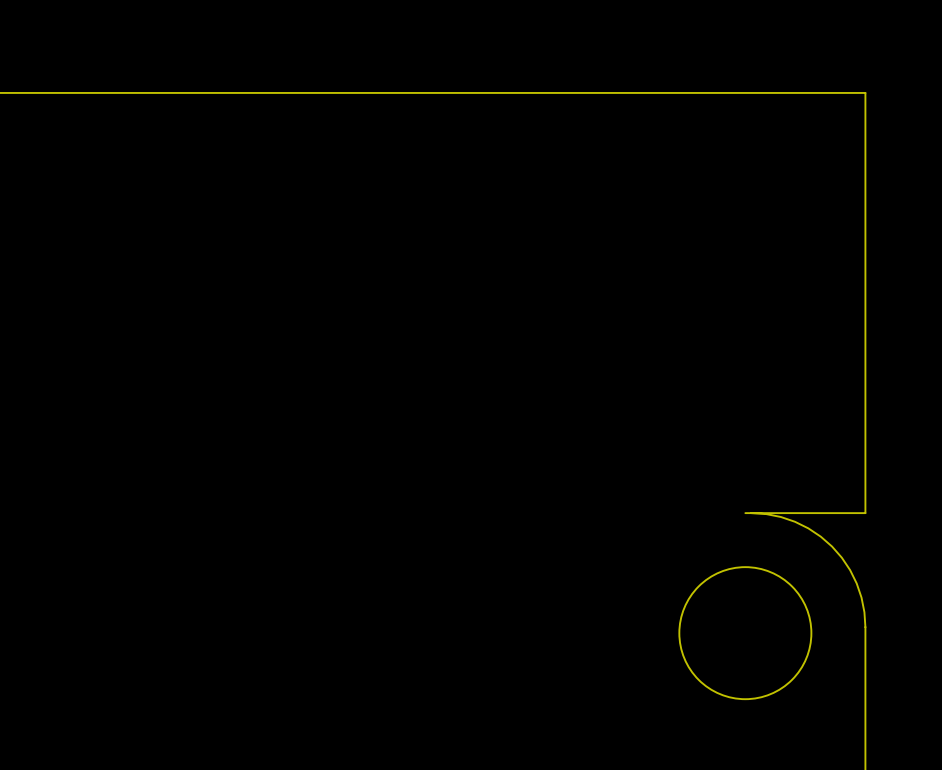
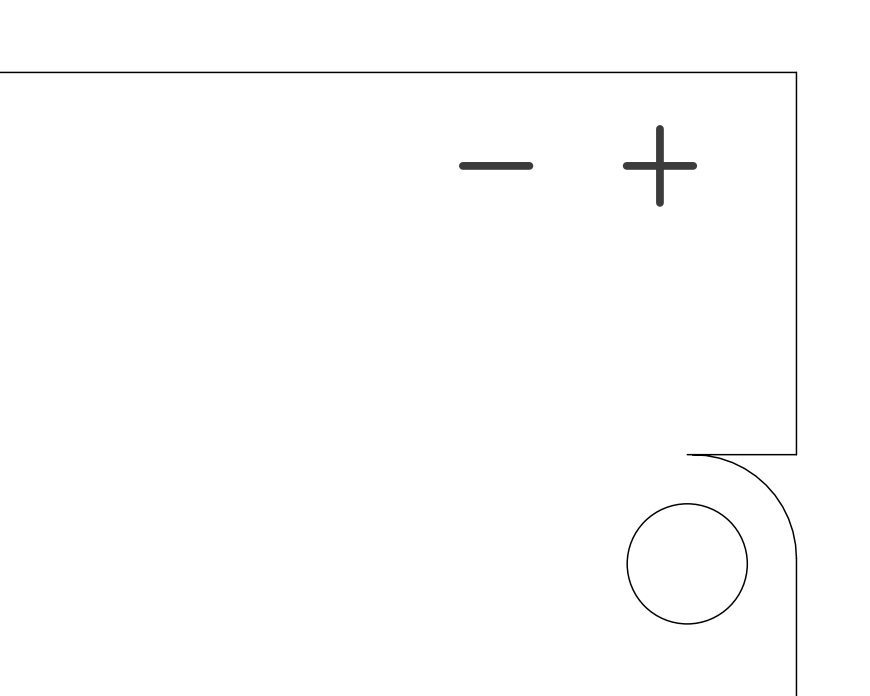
text: none -> - (496, 165)
text: none -> + (659, 165)

